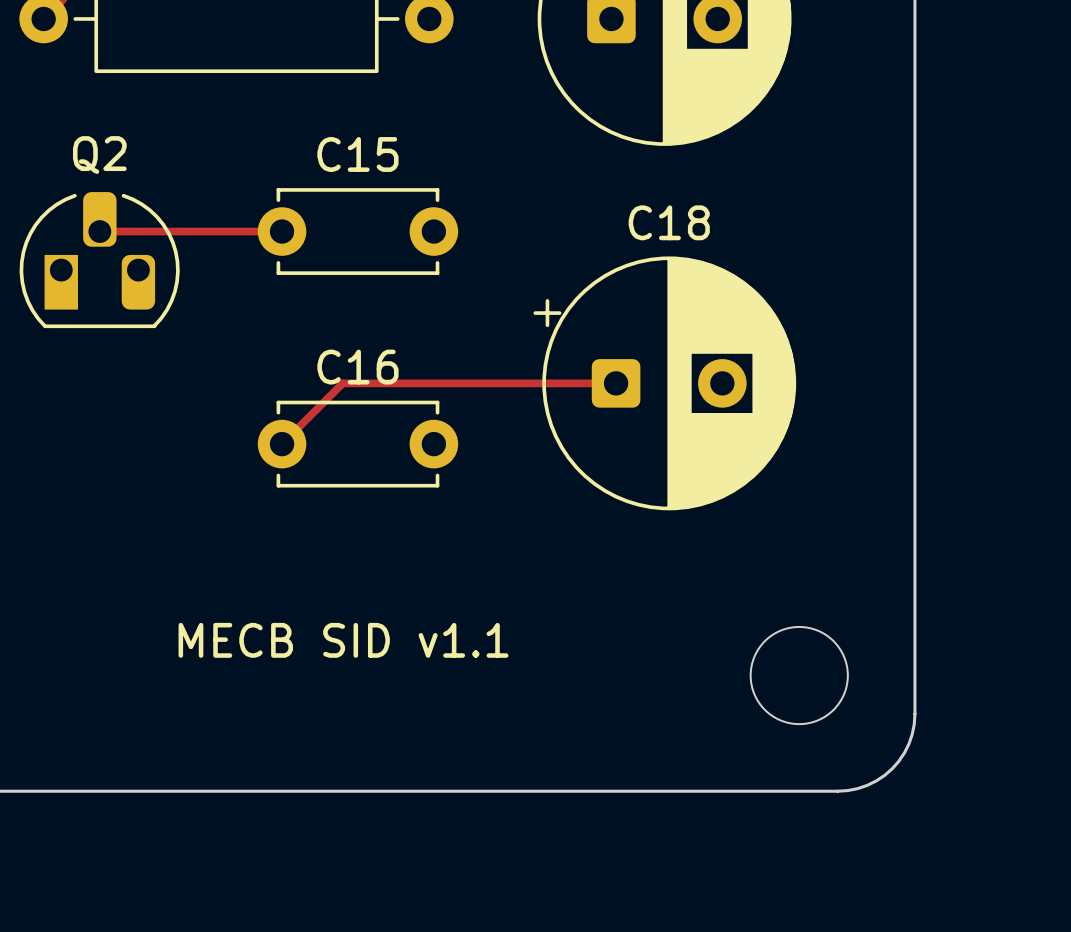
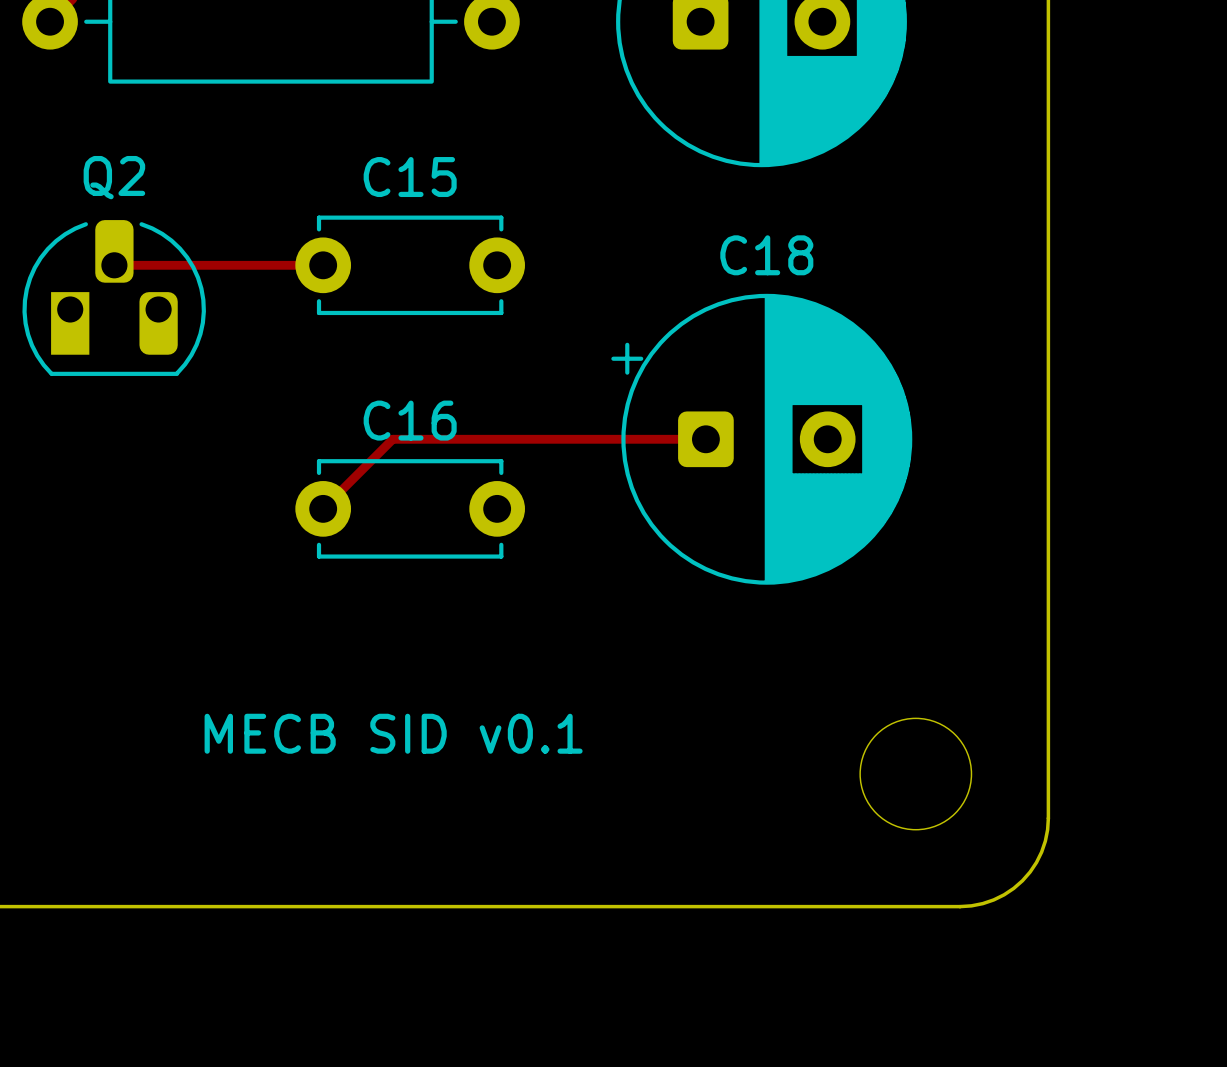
text: MECB SID v1.1 (343, 640) -> MECB SID v0.1 (393, 733)

